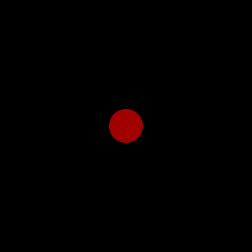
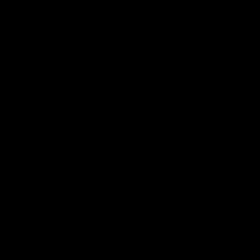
part: (125, 125) -> none

